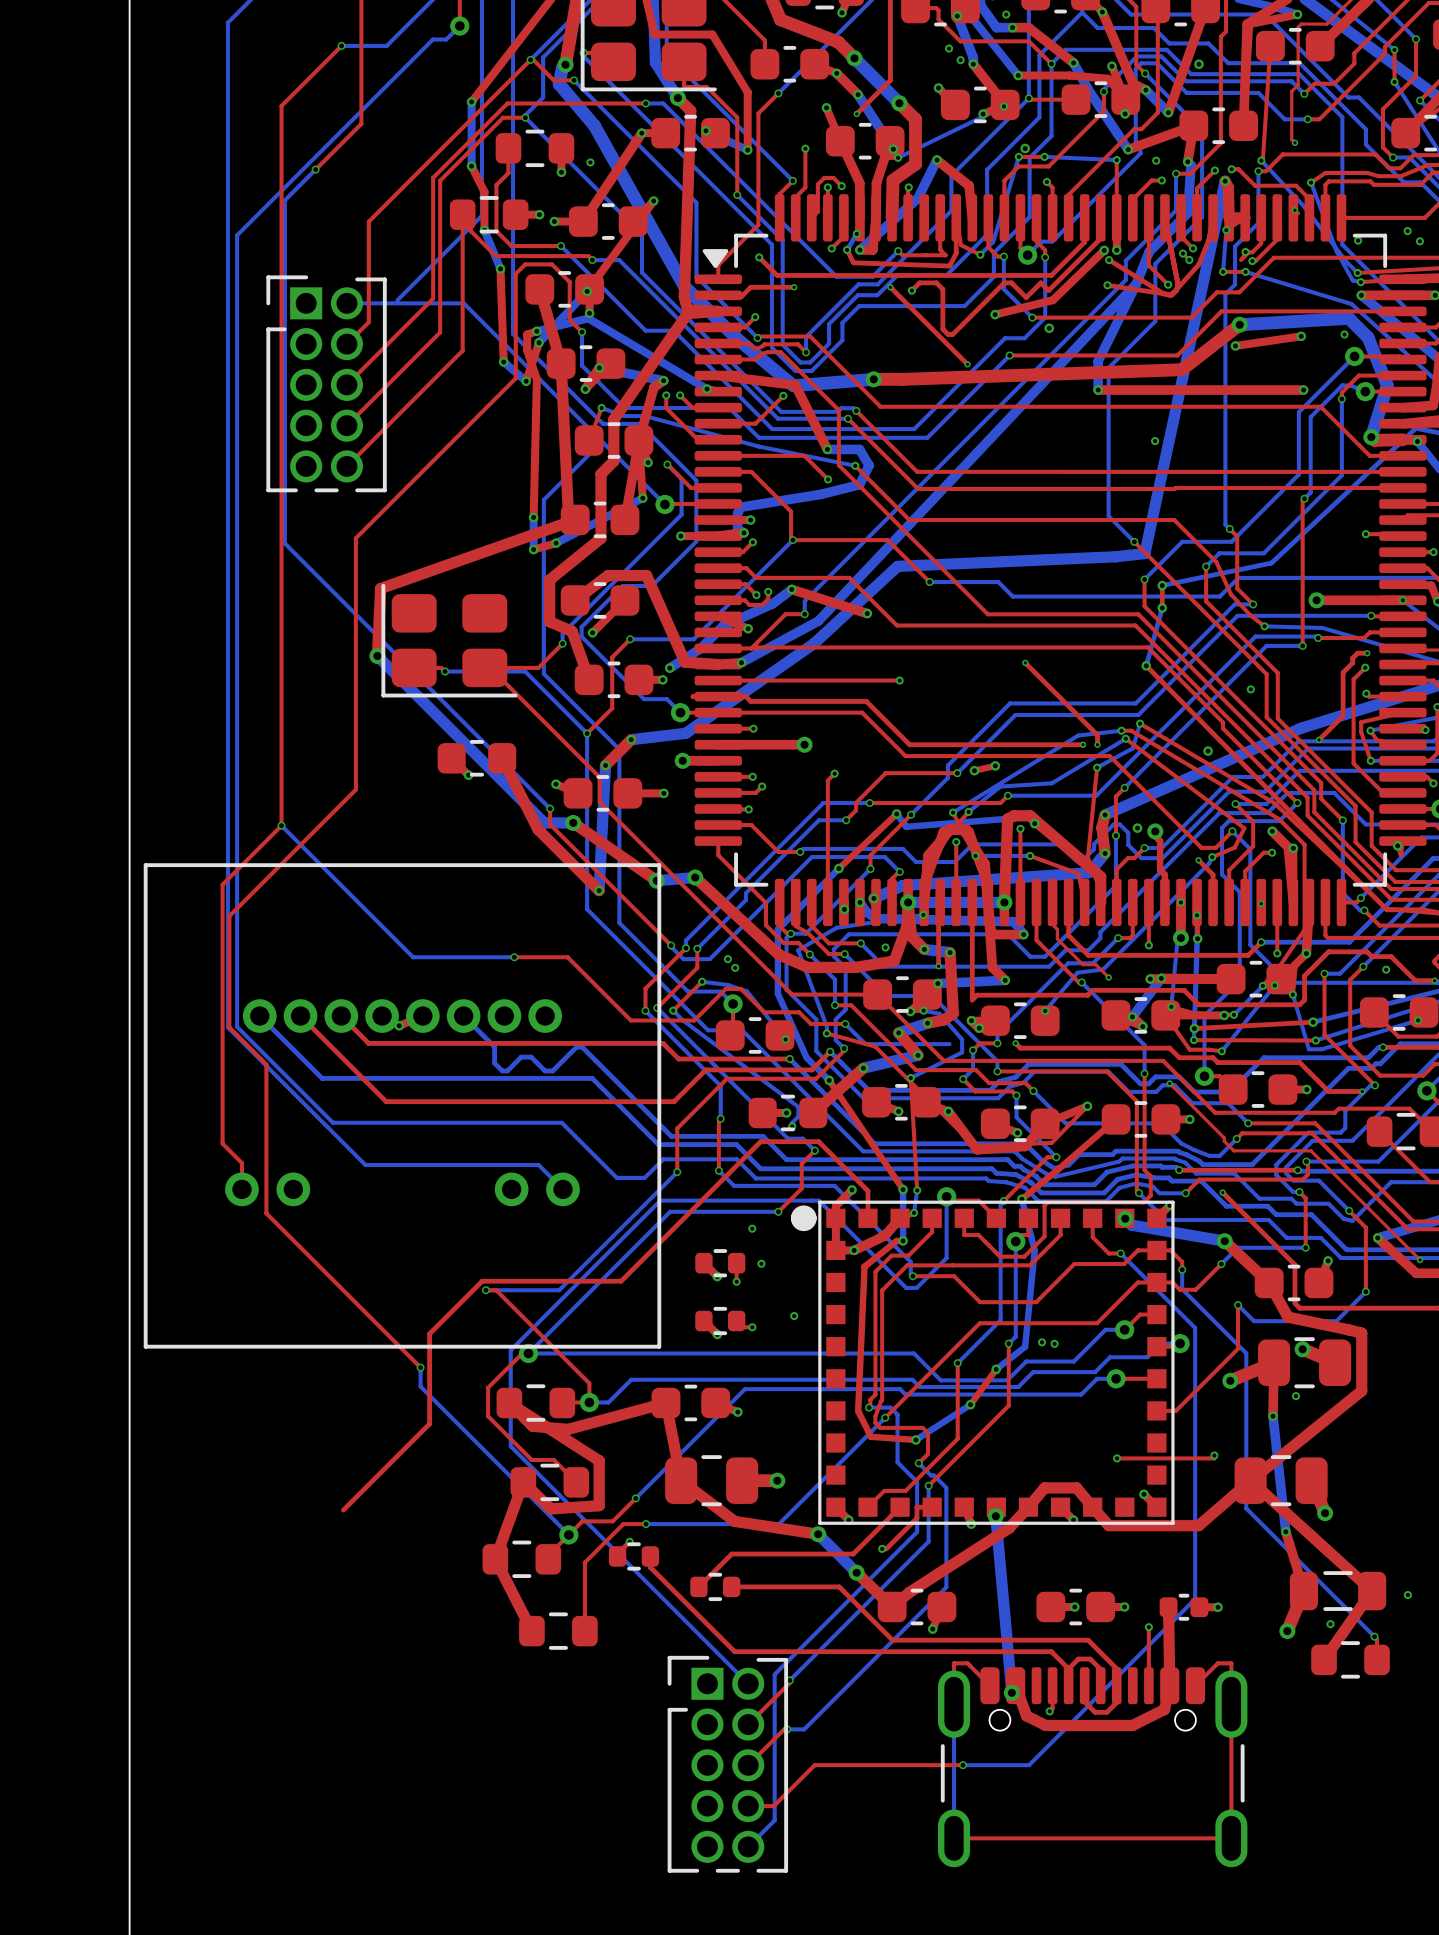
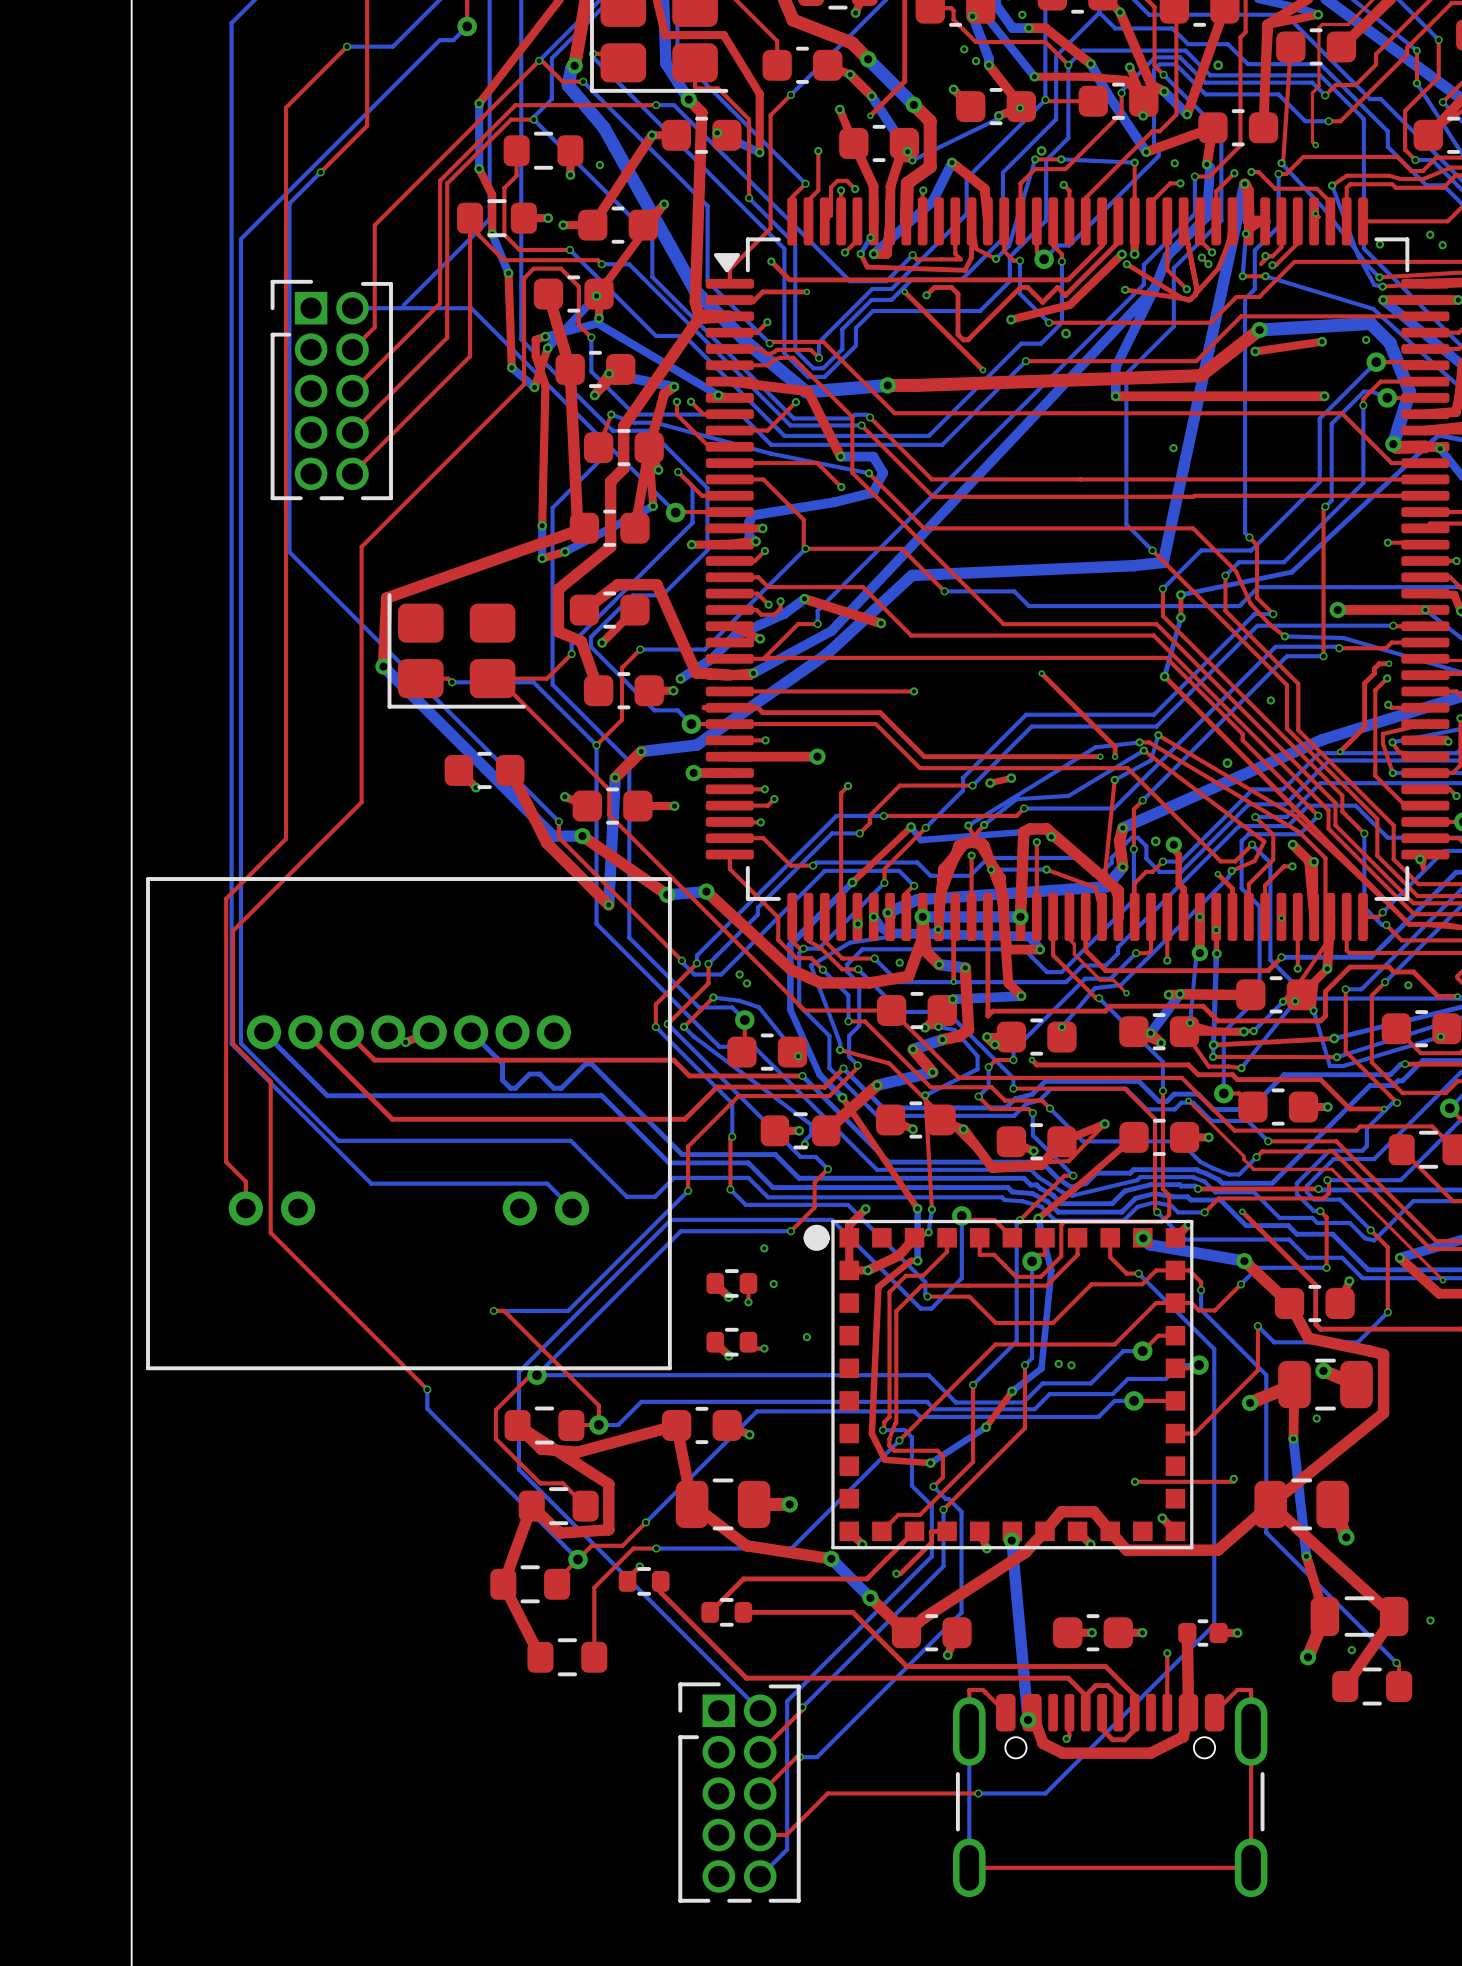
bottom track: (281, 825) (413, 957) (514, 957) -> none
via: (281, 825) -> none
top track: (514, 957) (567, 957) (630, 1020) (694, 1020) (725, 988) (741, 988) (764, 1012) (799, 1012) (810, 1023) (845, 1023) -> none
via: (514, 957) -> none
bottom track: (845, 1023) (865, 1044) (949, 1044) -> none
via: (845, 1023) -> none
top track: (867, 1218) (867, 1190) (818, 1141) (760, 1141) (621, 1281) (482, 1281) (429, 1333) (429, 1423) (343, 1510) -> none

